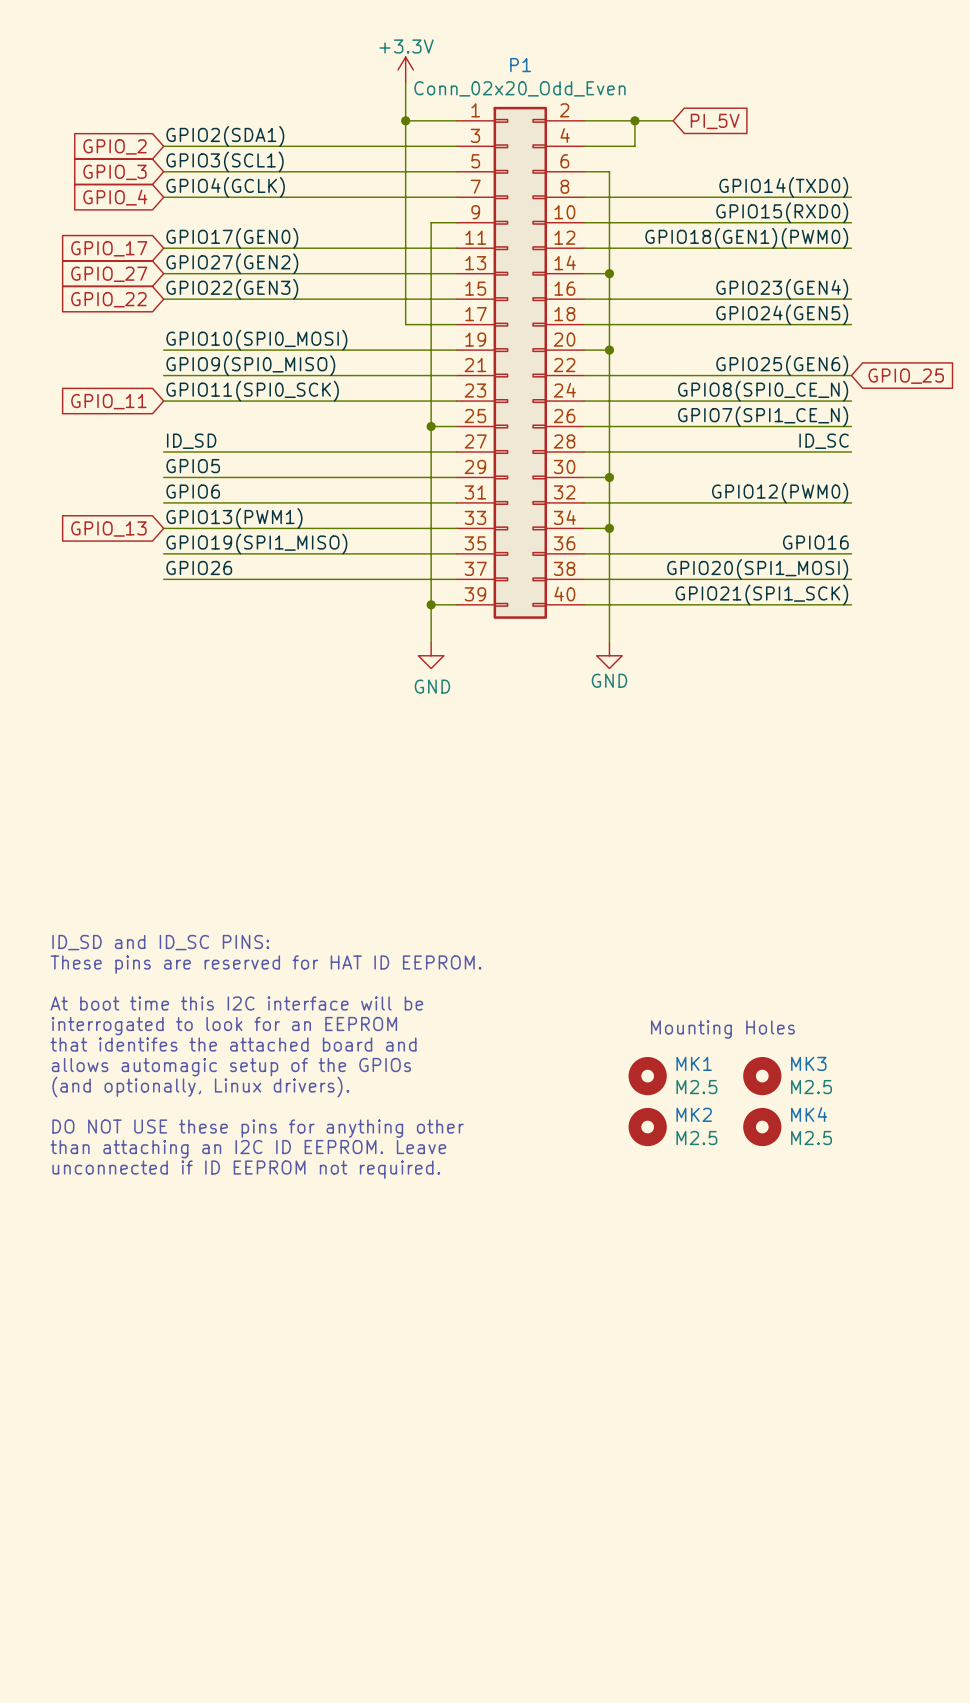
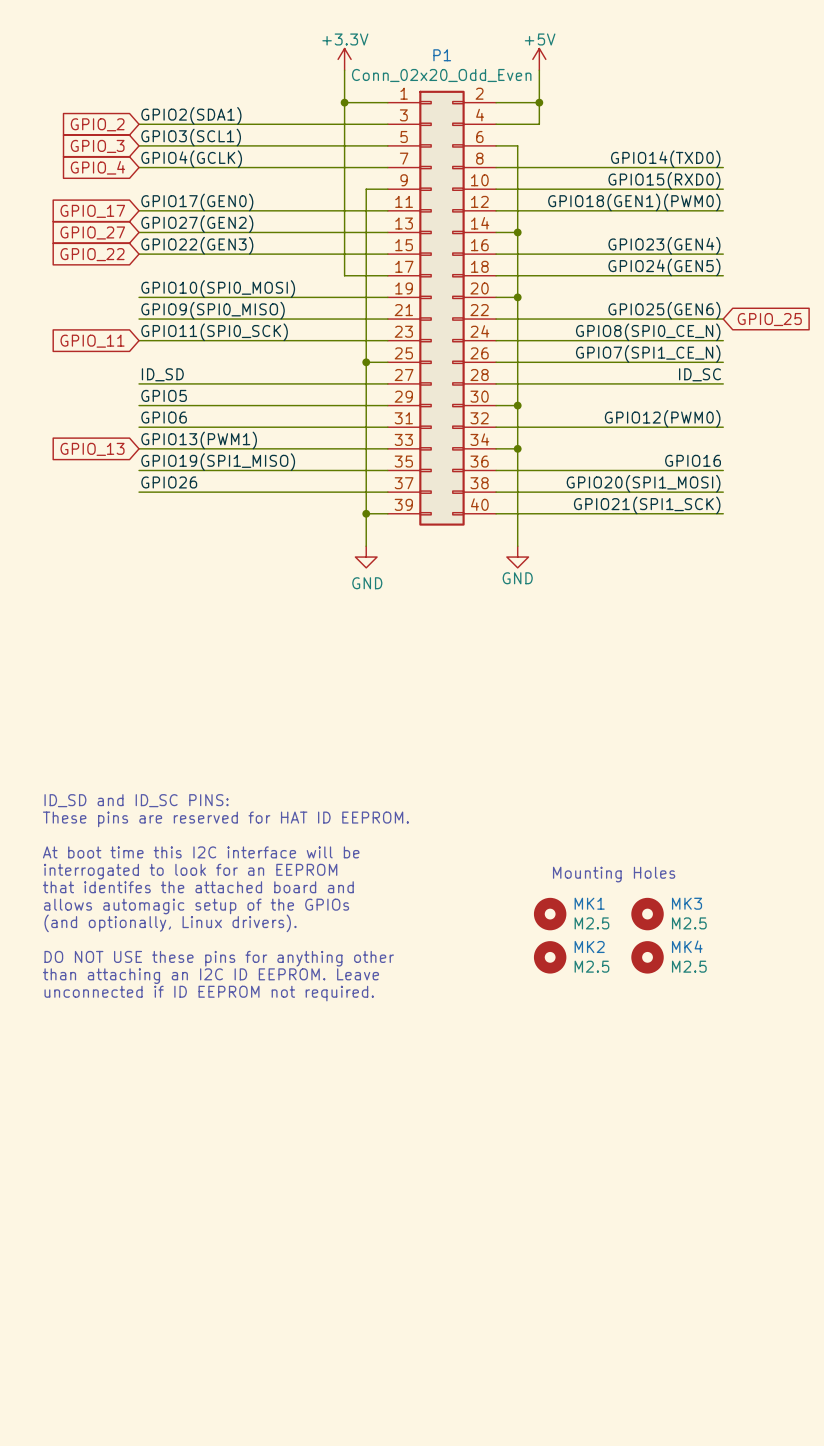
power symbol: none -> +5V (539, 59)
wire: (634, 120) (673, 120) -> (539, 102) (539, 70)
global label: PI_5V (715, 121) -> none

